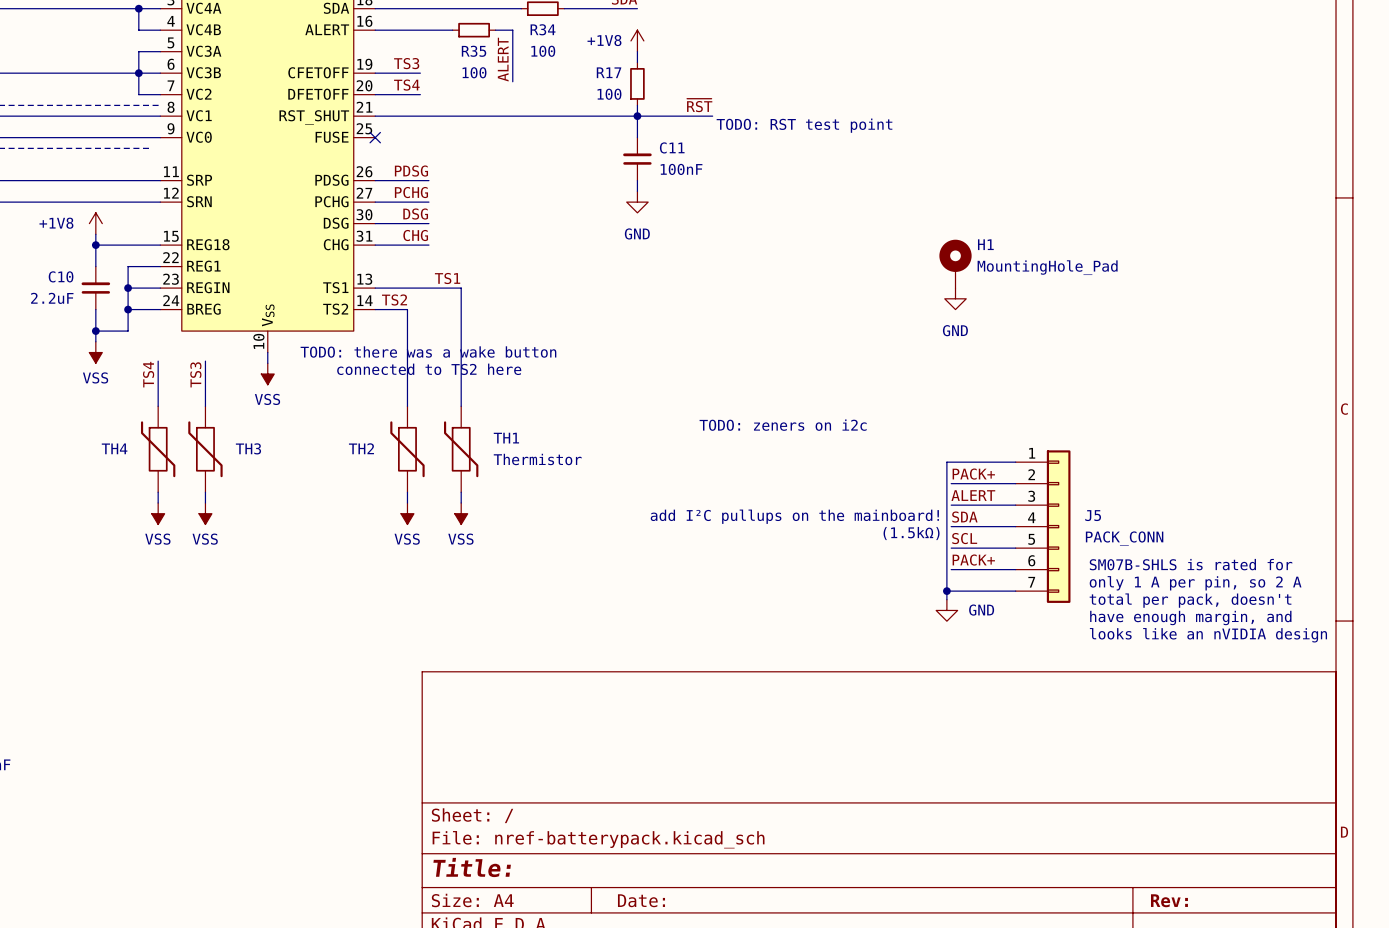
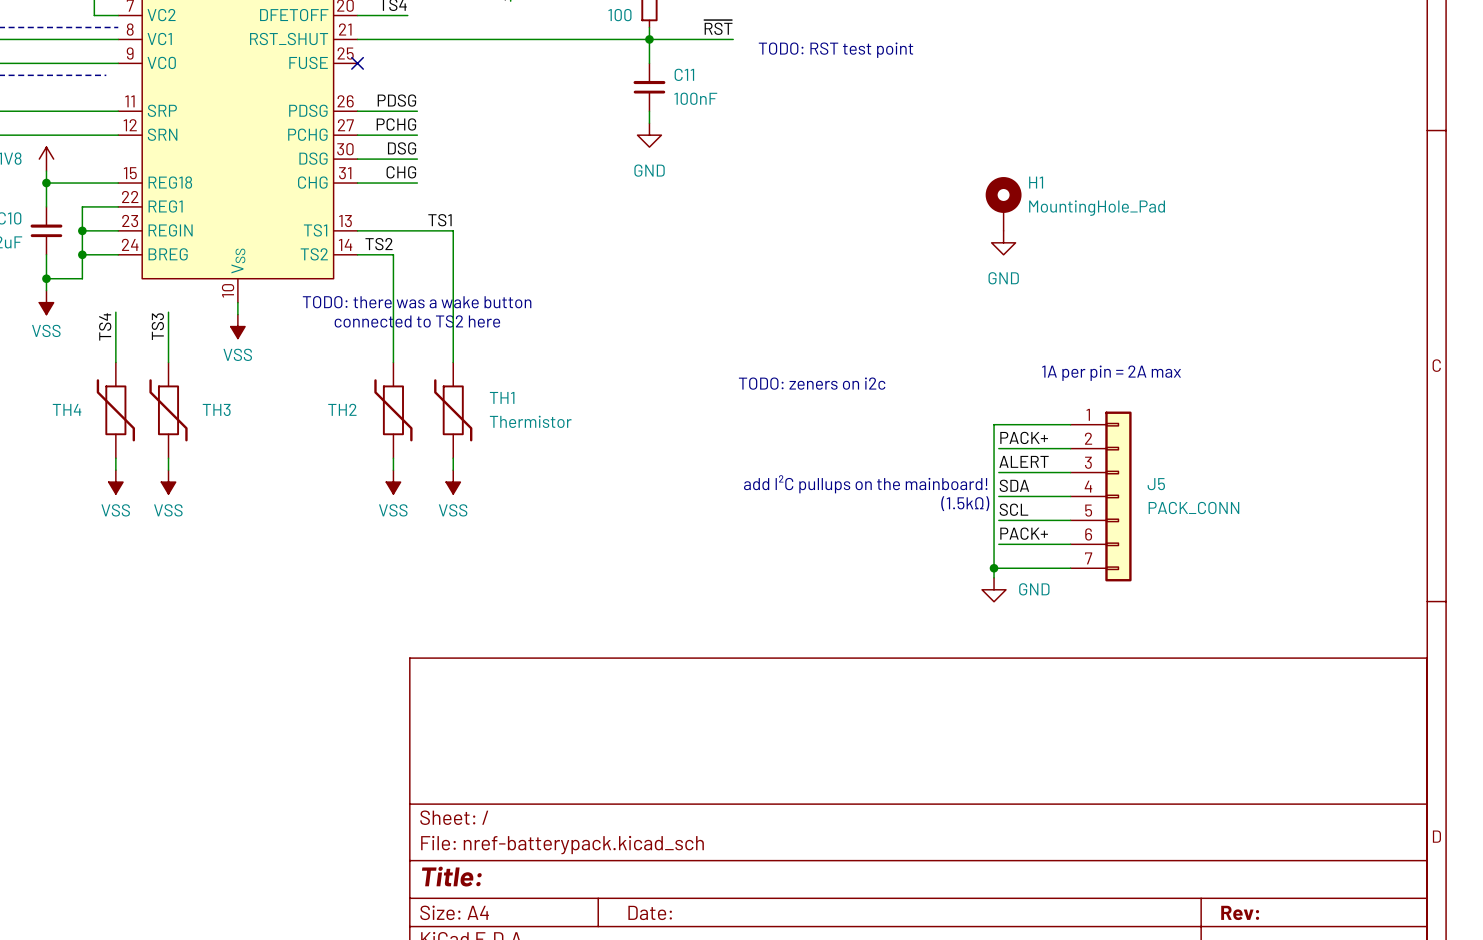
text: none -> 1A per pin = 2A max (1111, 373)
text: SM07B-SHLS is rated for (1191, 564) -> none
text: only 1 A per pin, so 2 A (1195, 583) -> none
text: total per pack, doesn't (1190, 600) -> none
text: have enough margin, and (1190, 617) -> none
text: looks like an nVIDIA design (1208, 635) -> none

